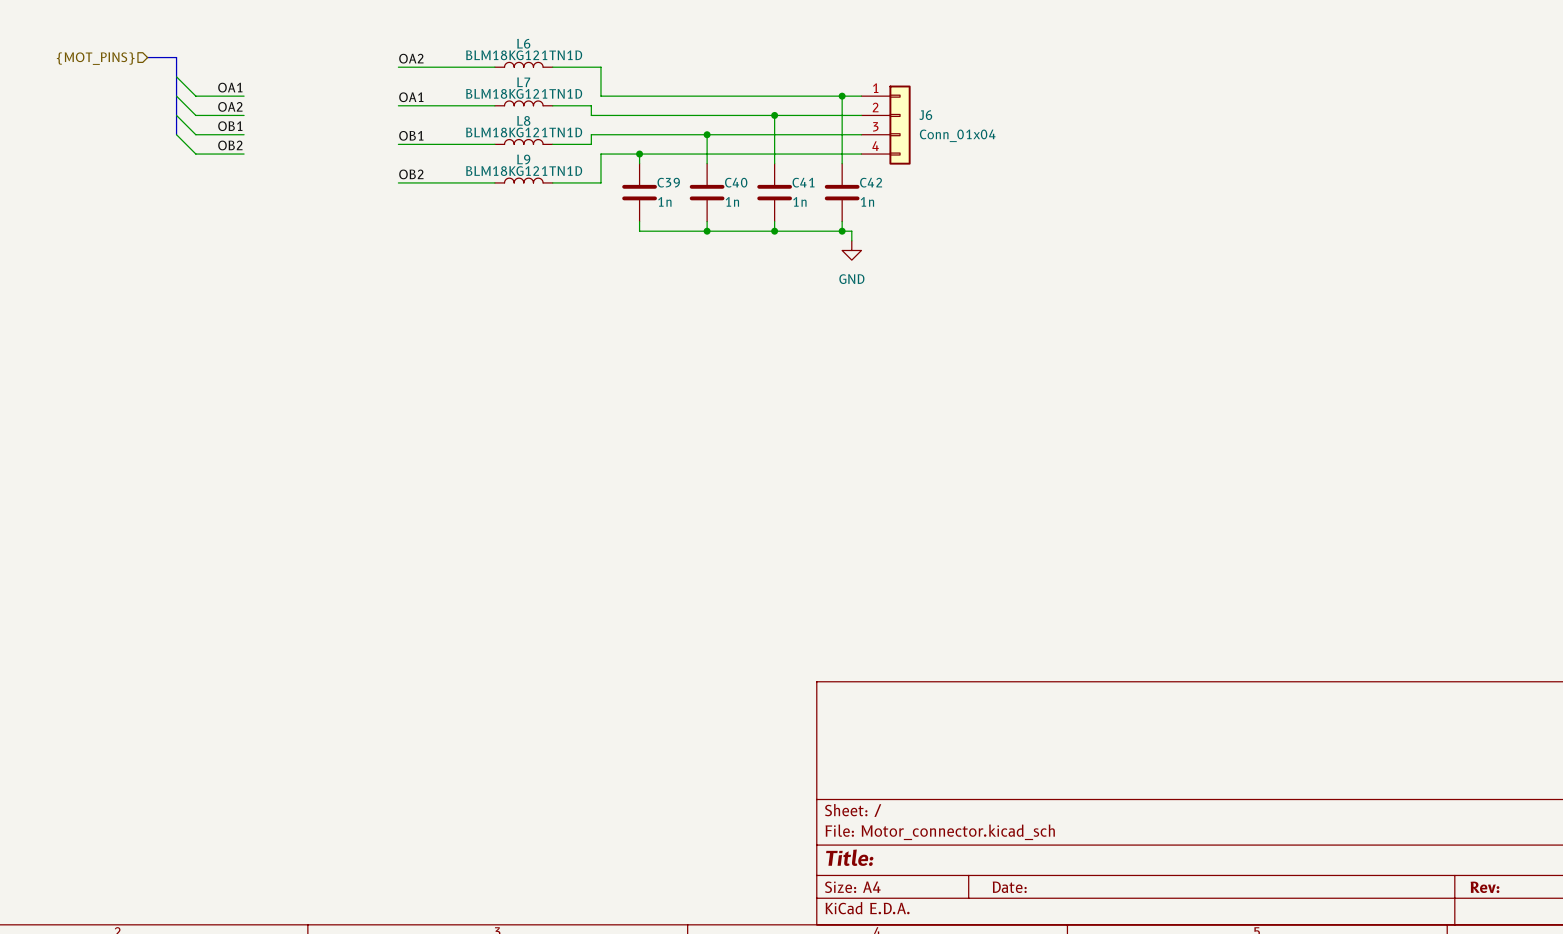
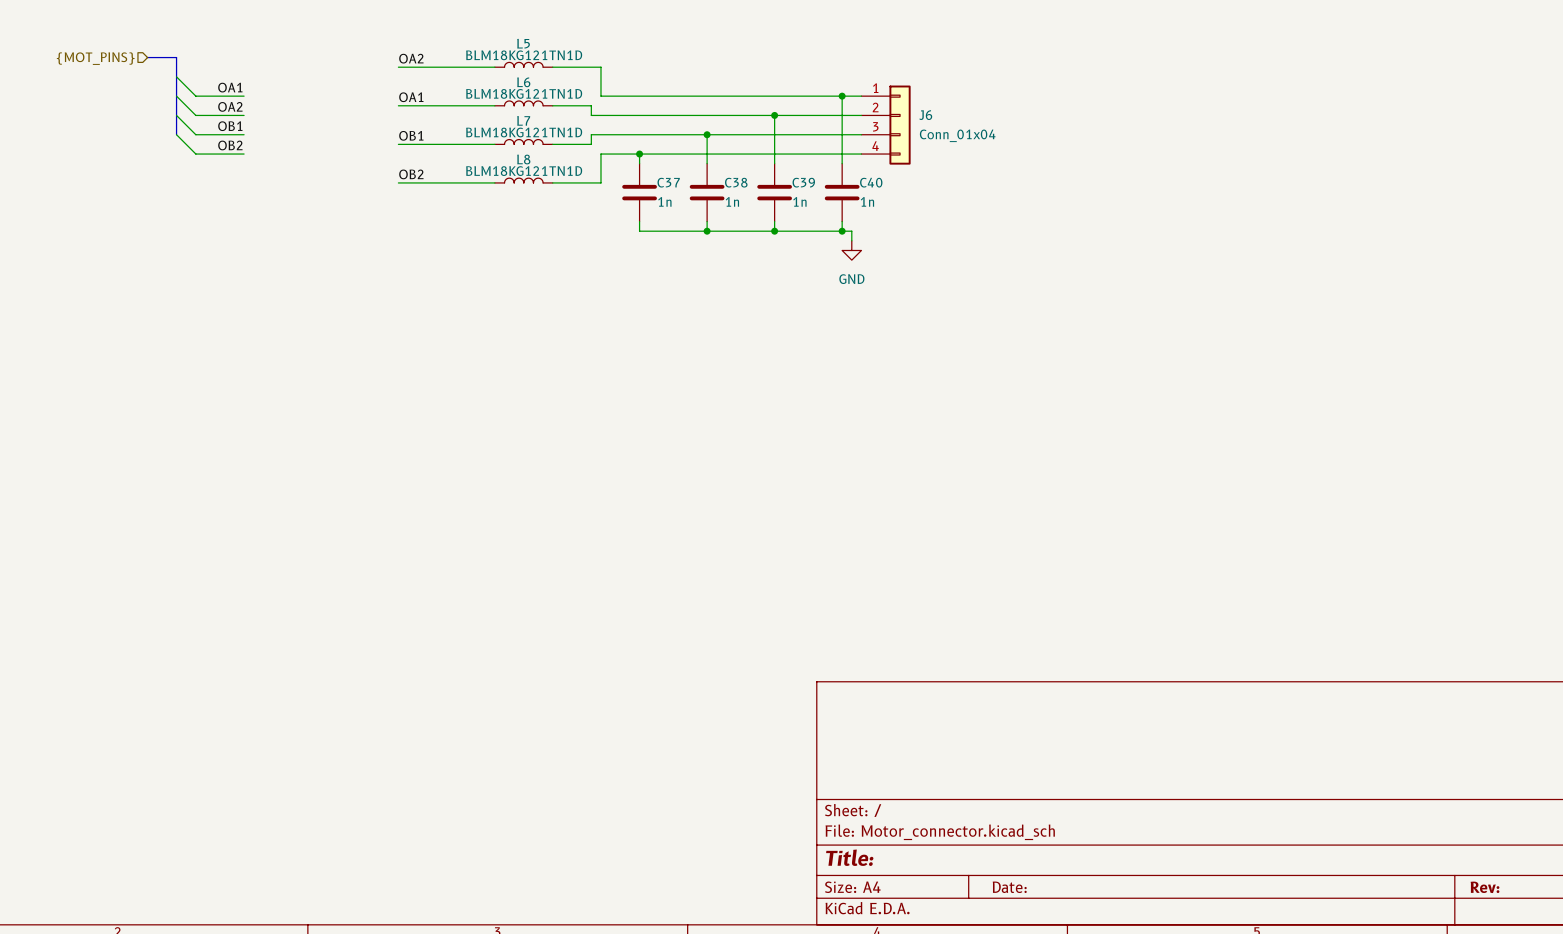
L6 name: L6 (523, 43) -> L5 (523, 43)
L7 name: L7 (523, 82) -> L6 (523, 82)
L8 name: L8 (523, 120) -> L7 (523, 120)
L9 name: L9 (523, 159) -> L8 (523, 159)
C39 name: C39 (668, 182) -> C37 (668, 182)
C40 name: C40 (736, 182) -> C38 (736, 182)
C41 name: C41 (803, 182) -> C39 (803, 182)
C42 name: C42 (871, 182) -> C40 (871, 182)

